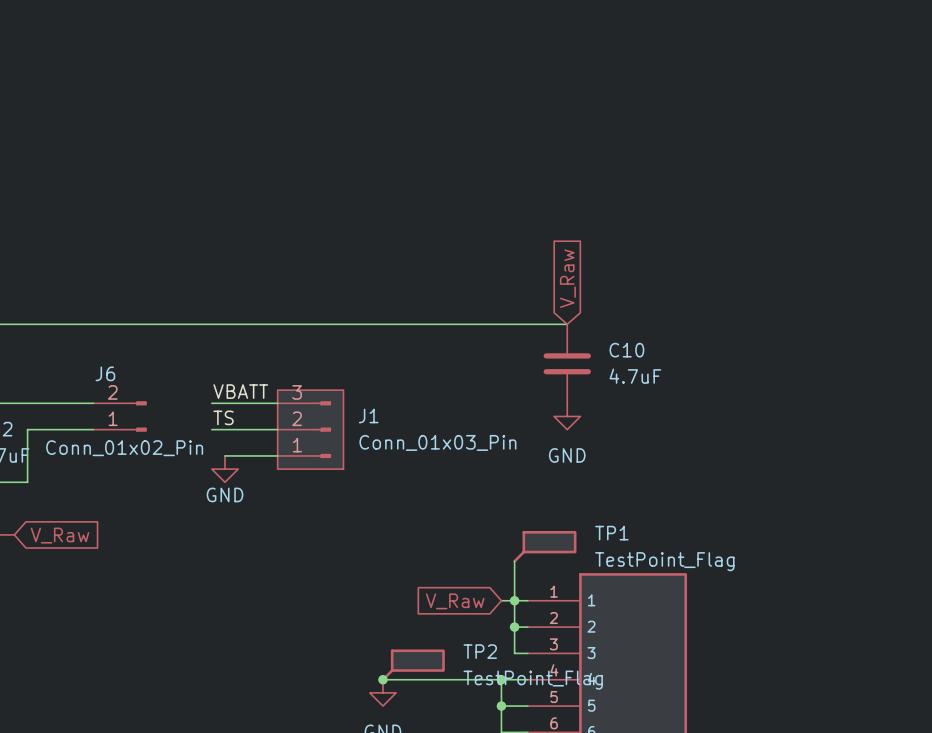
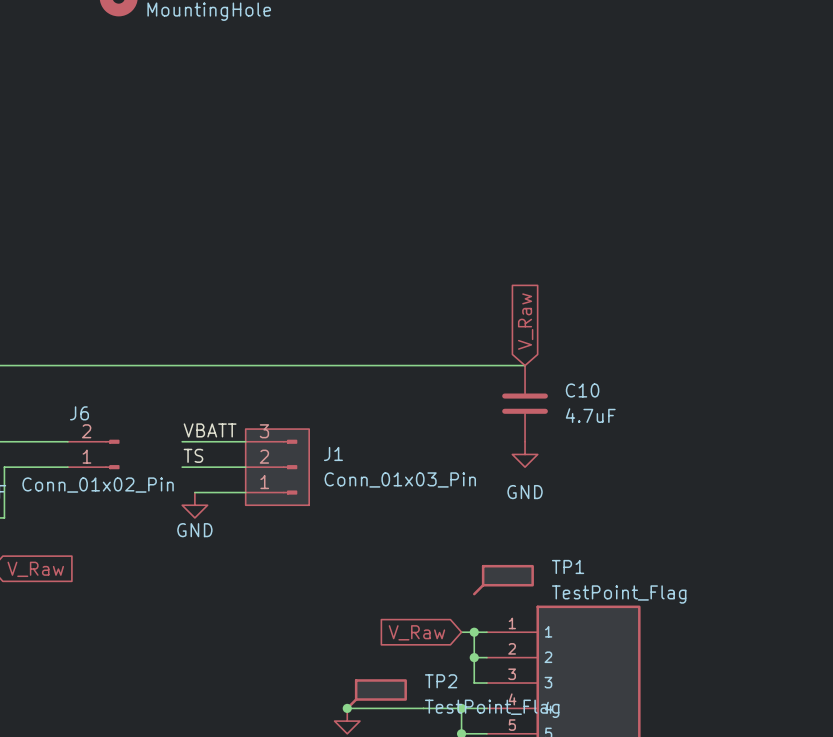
wire: (514, 561) (514, 600) -> none

